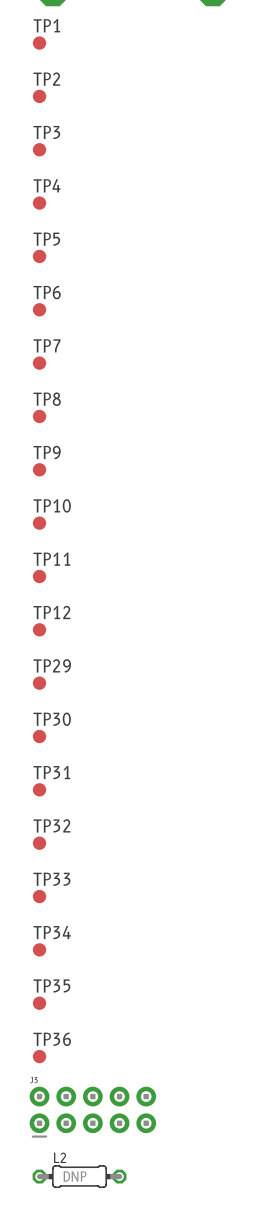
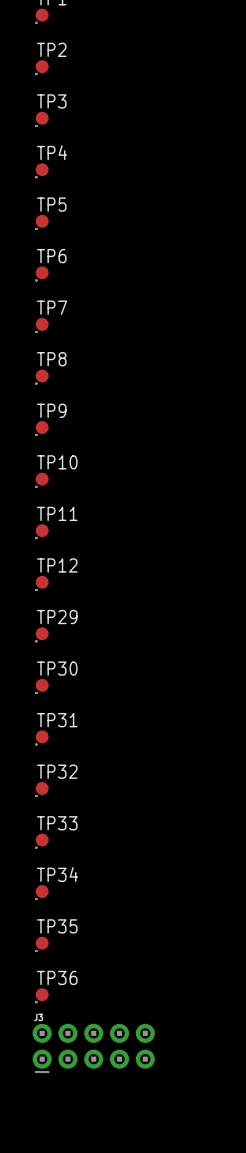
L2: DNP (79, 1176) -> none

